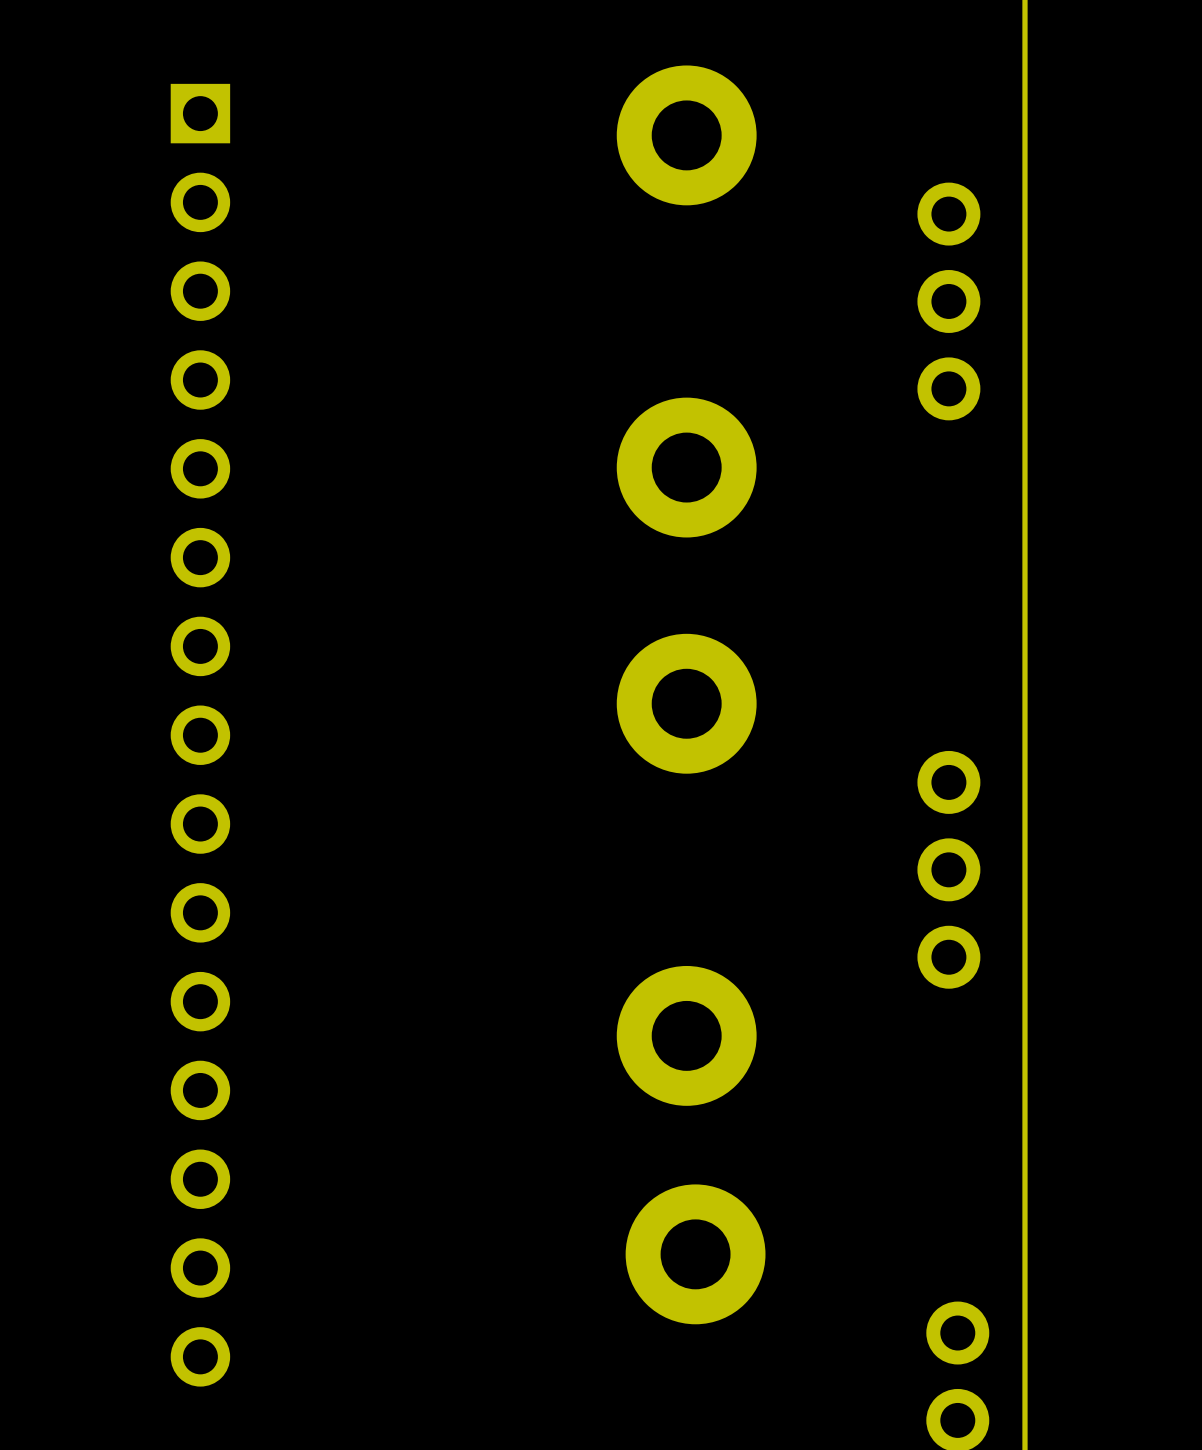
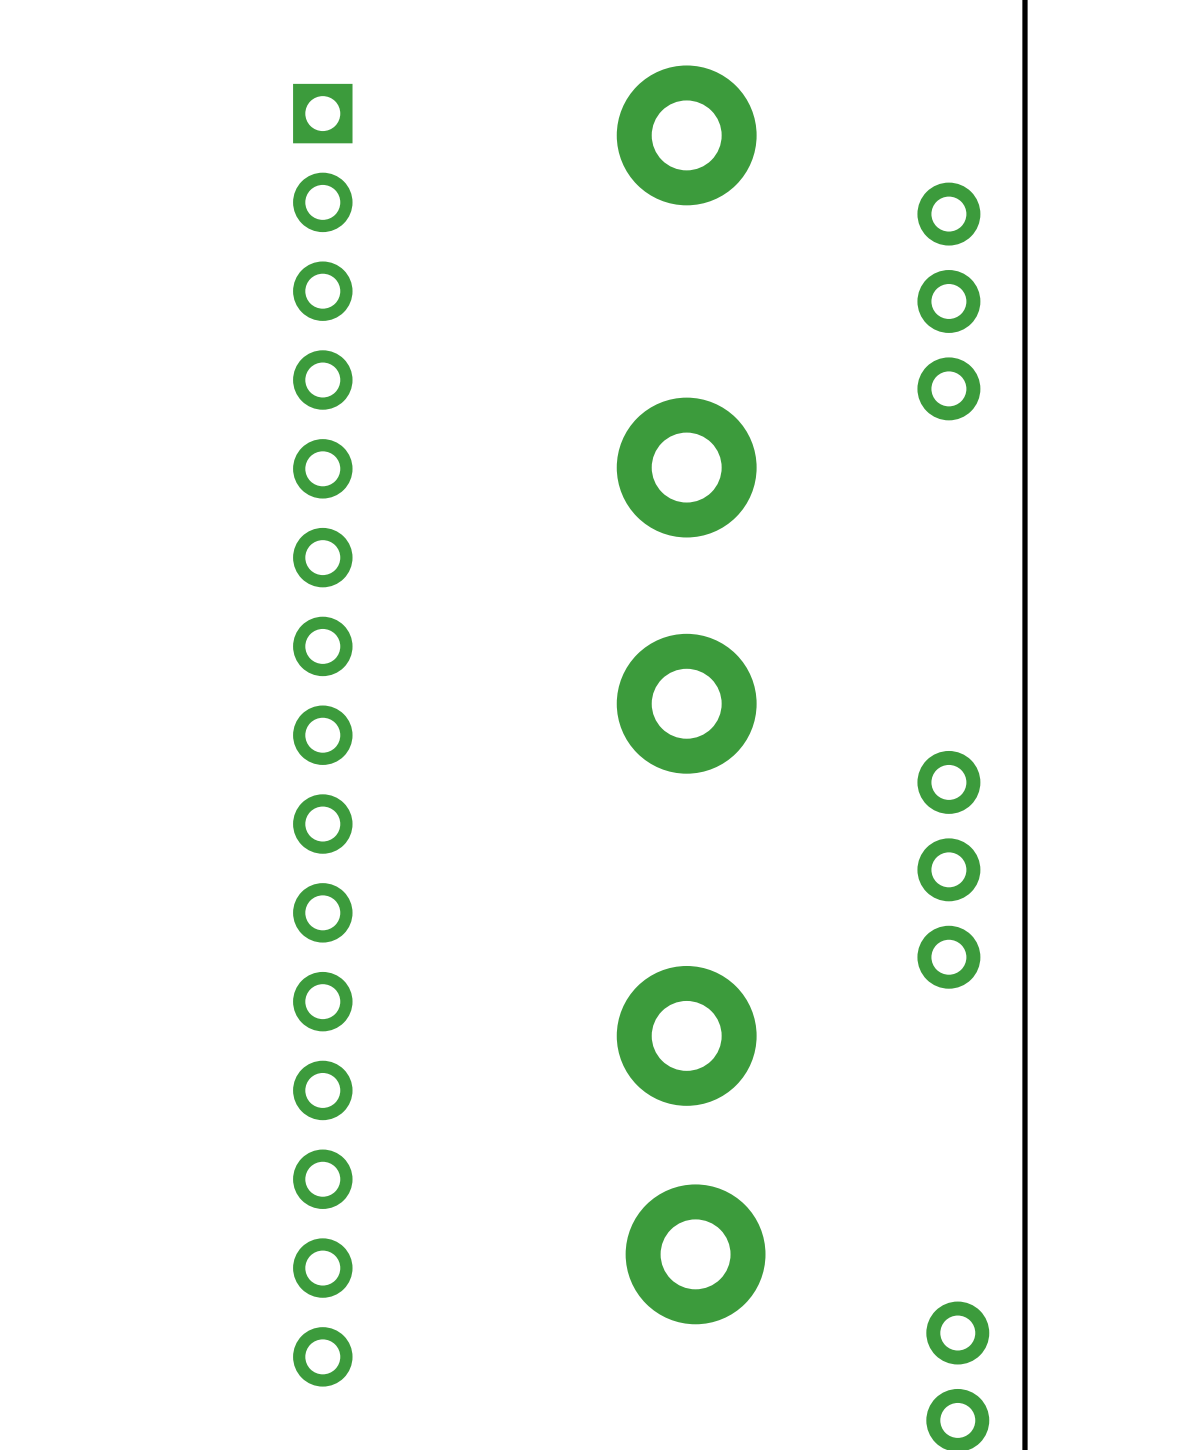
part position: (200, 735) -> (322, 735)

